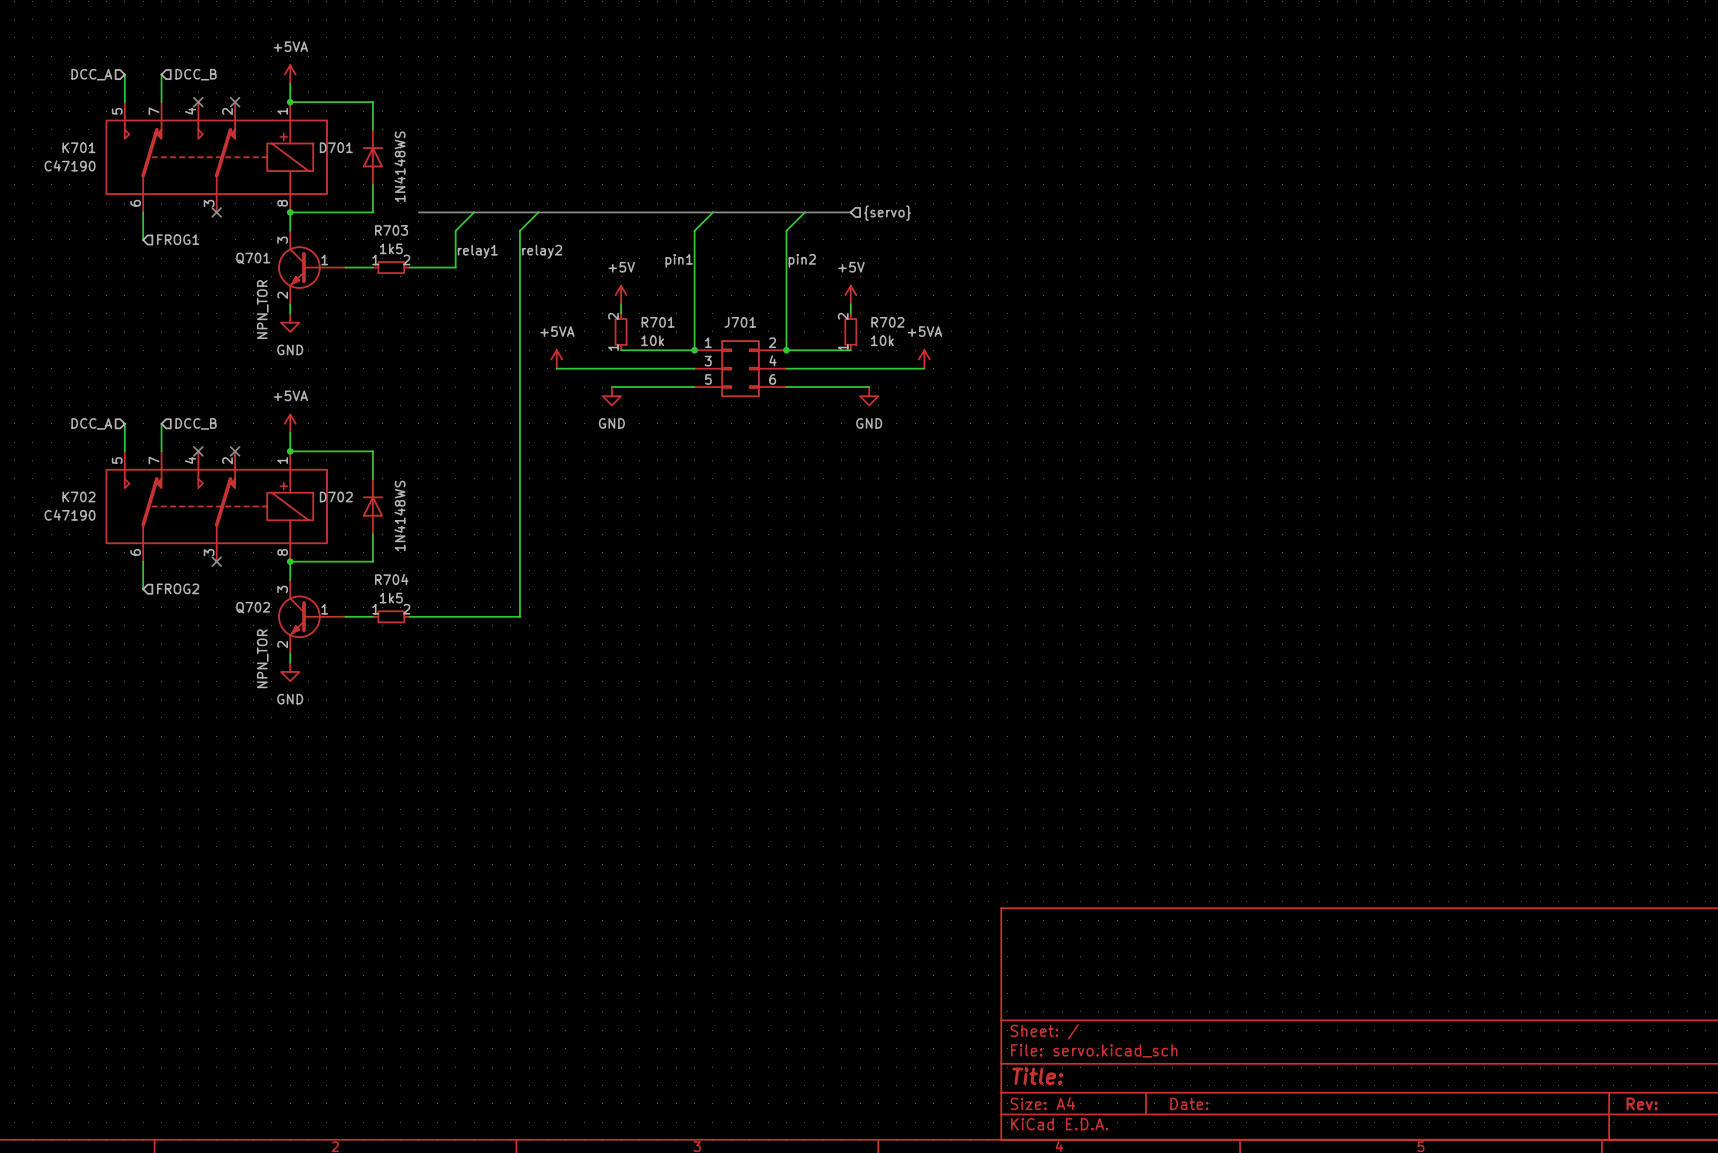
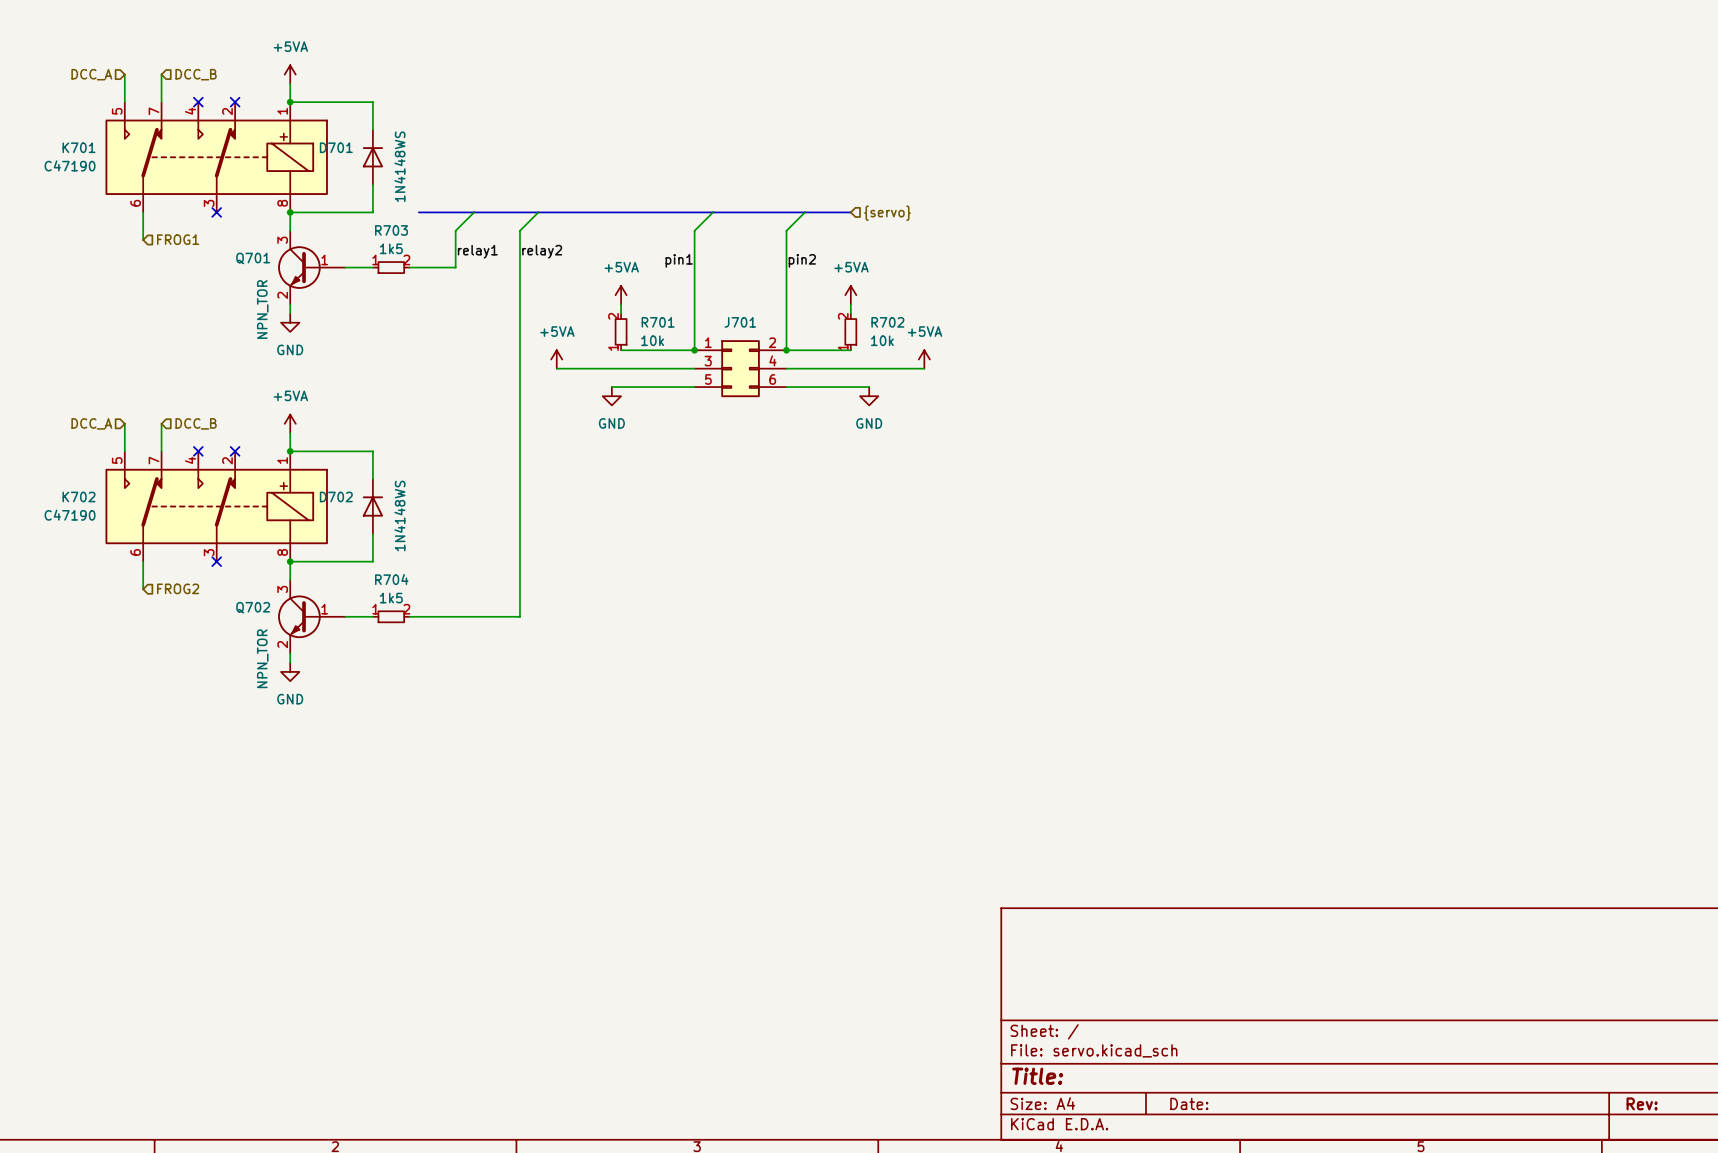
power symbol: +5V (621, 295) -> +5VA (621, 295)
power symbol: +5V (850, 295) -> +5VA (850, 295)

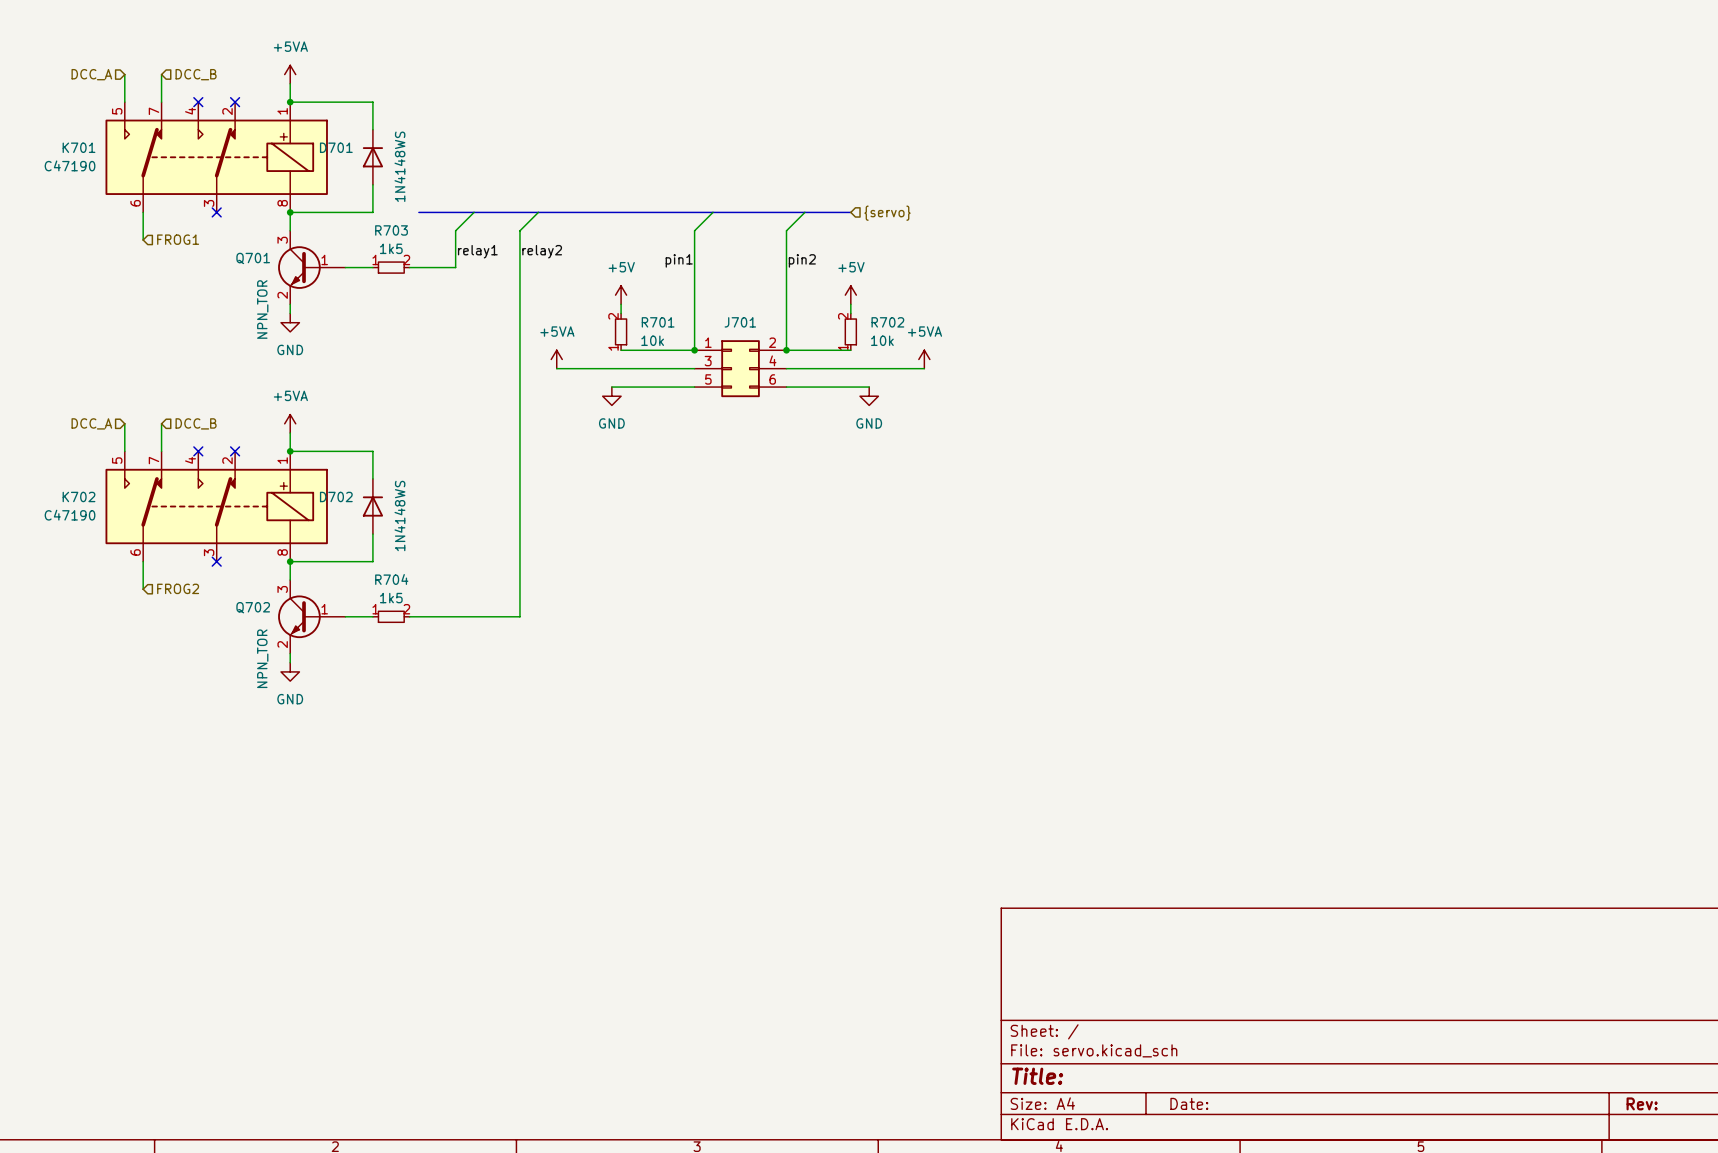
power symbol: +5VA (621, 295) -> +5V (621, 295)
power symbol: +5VA (850, 295) -> +5V (850, 295)

